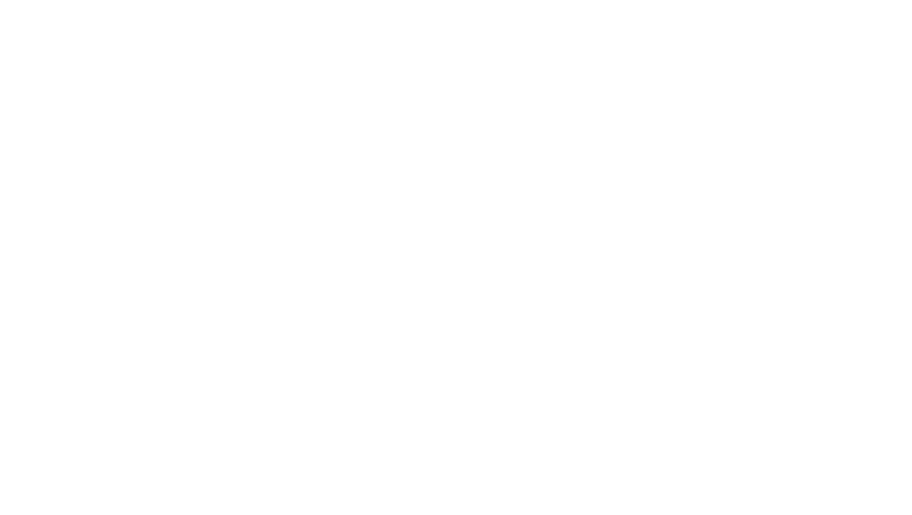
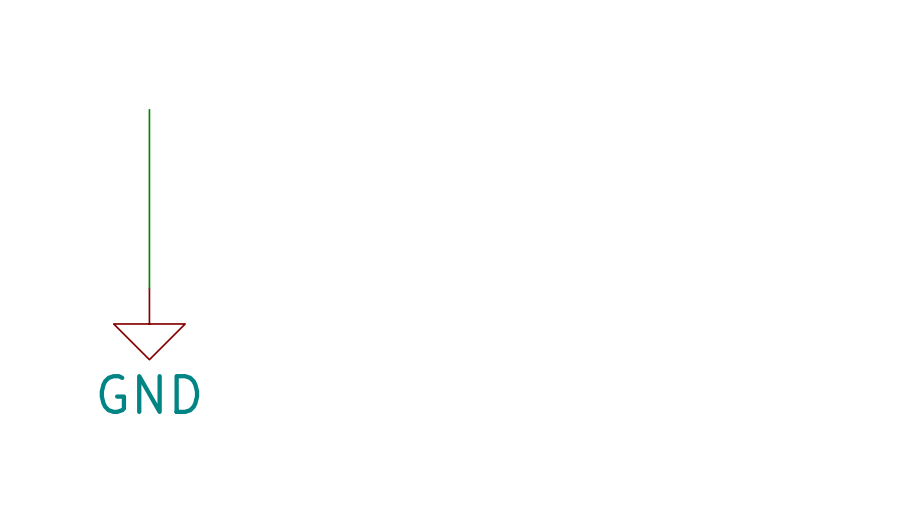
wire: none -> (149, 109) (149, 288)
power symbol: none -> GND (149, 323)

